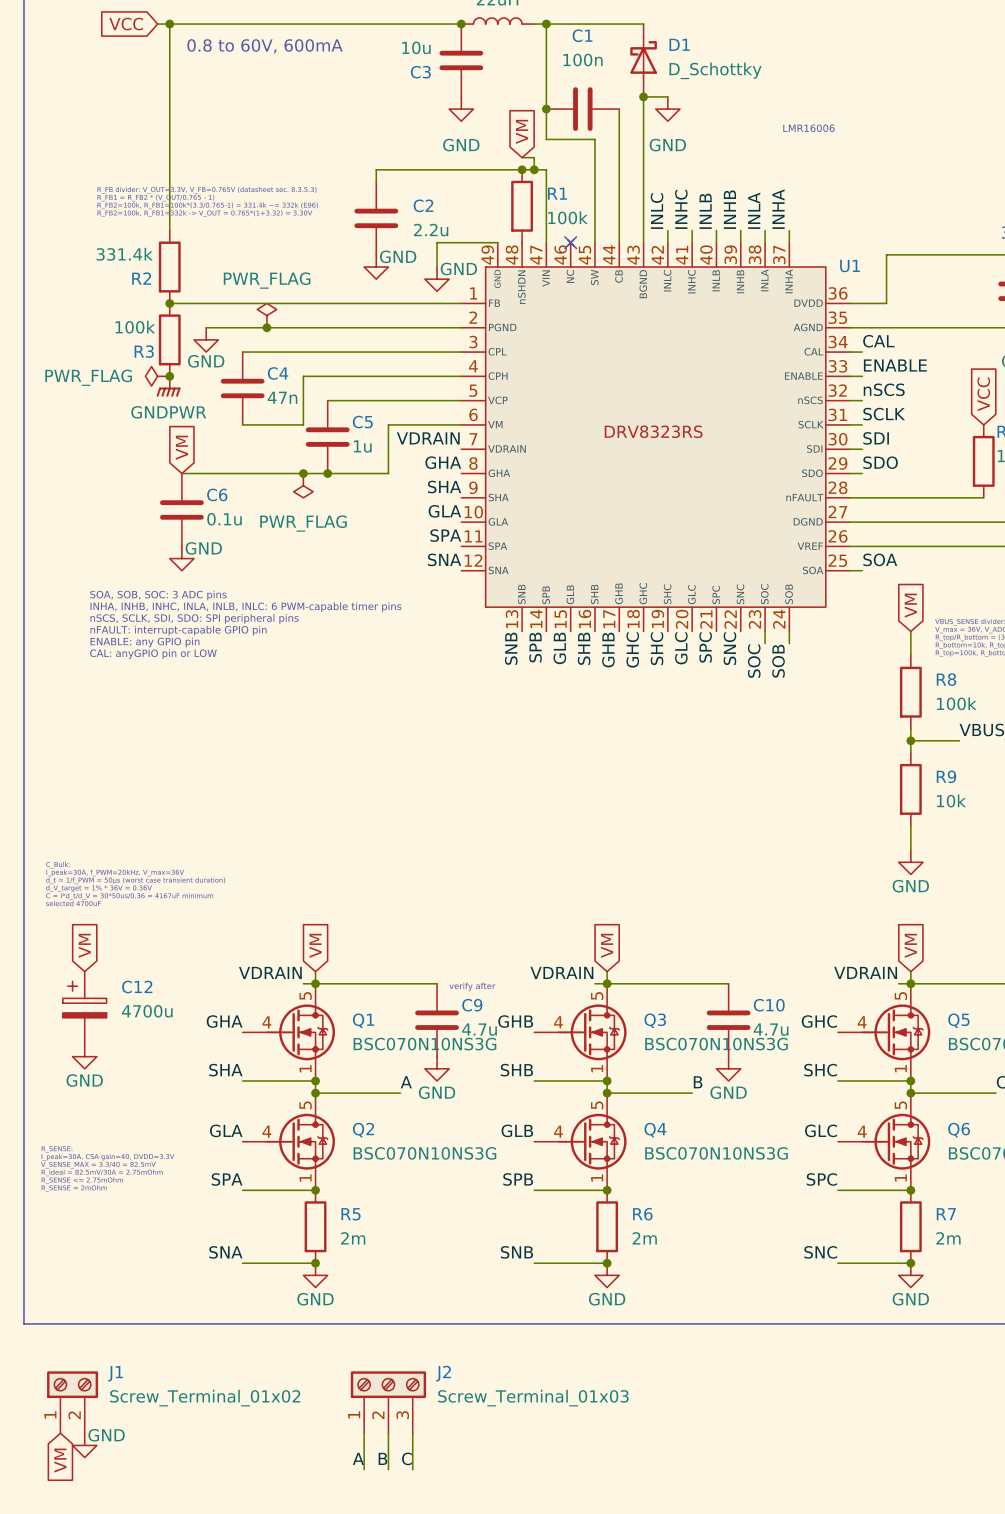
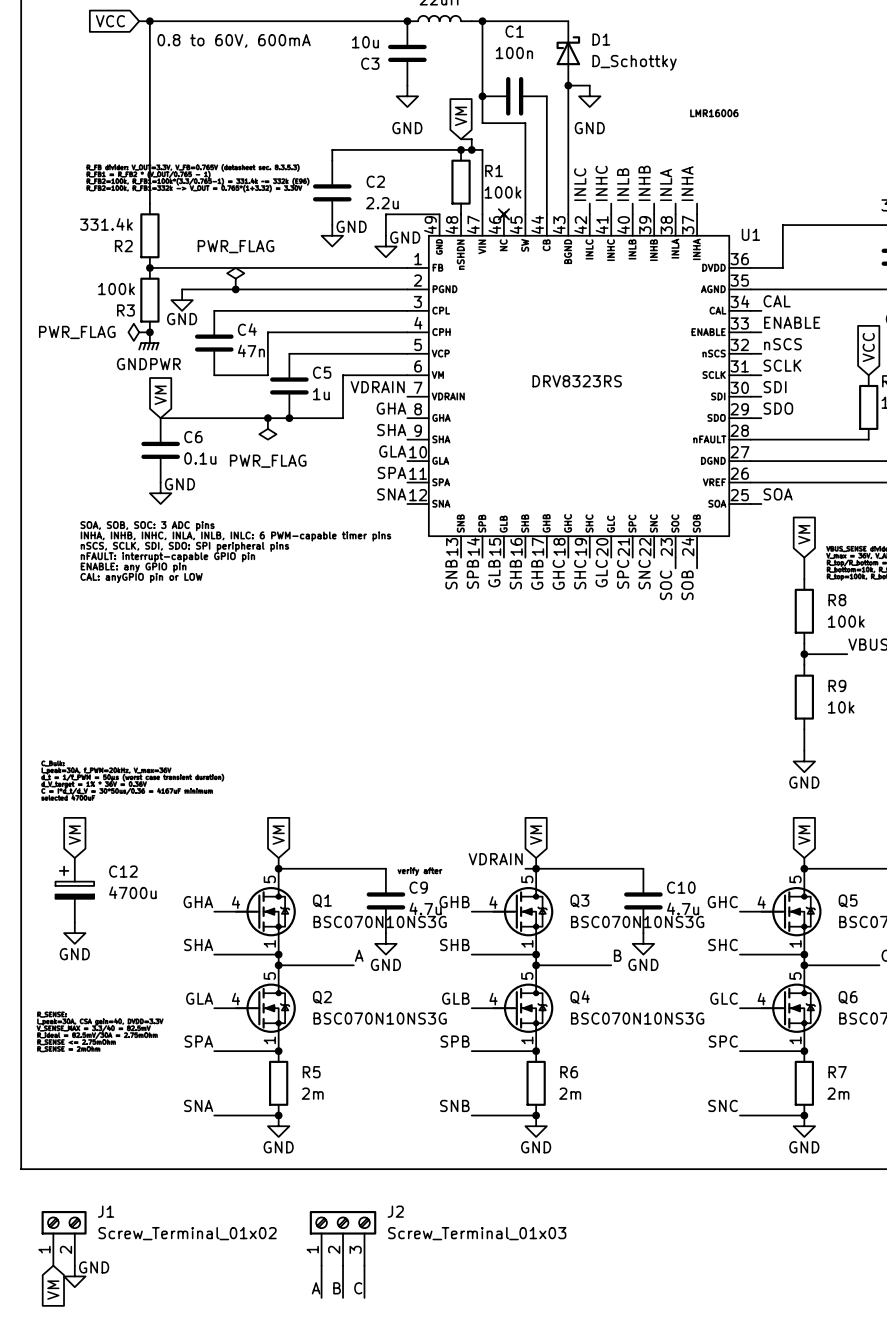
label: VDRAIN (270, 972) -> none
label: VDRAIN (865, 972) -> none
wire: (303, 983) (315, 983) -> none
wire: (898, 983) (910, 983) -> none

